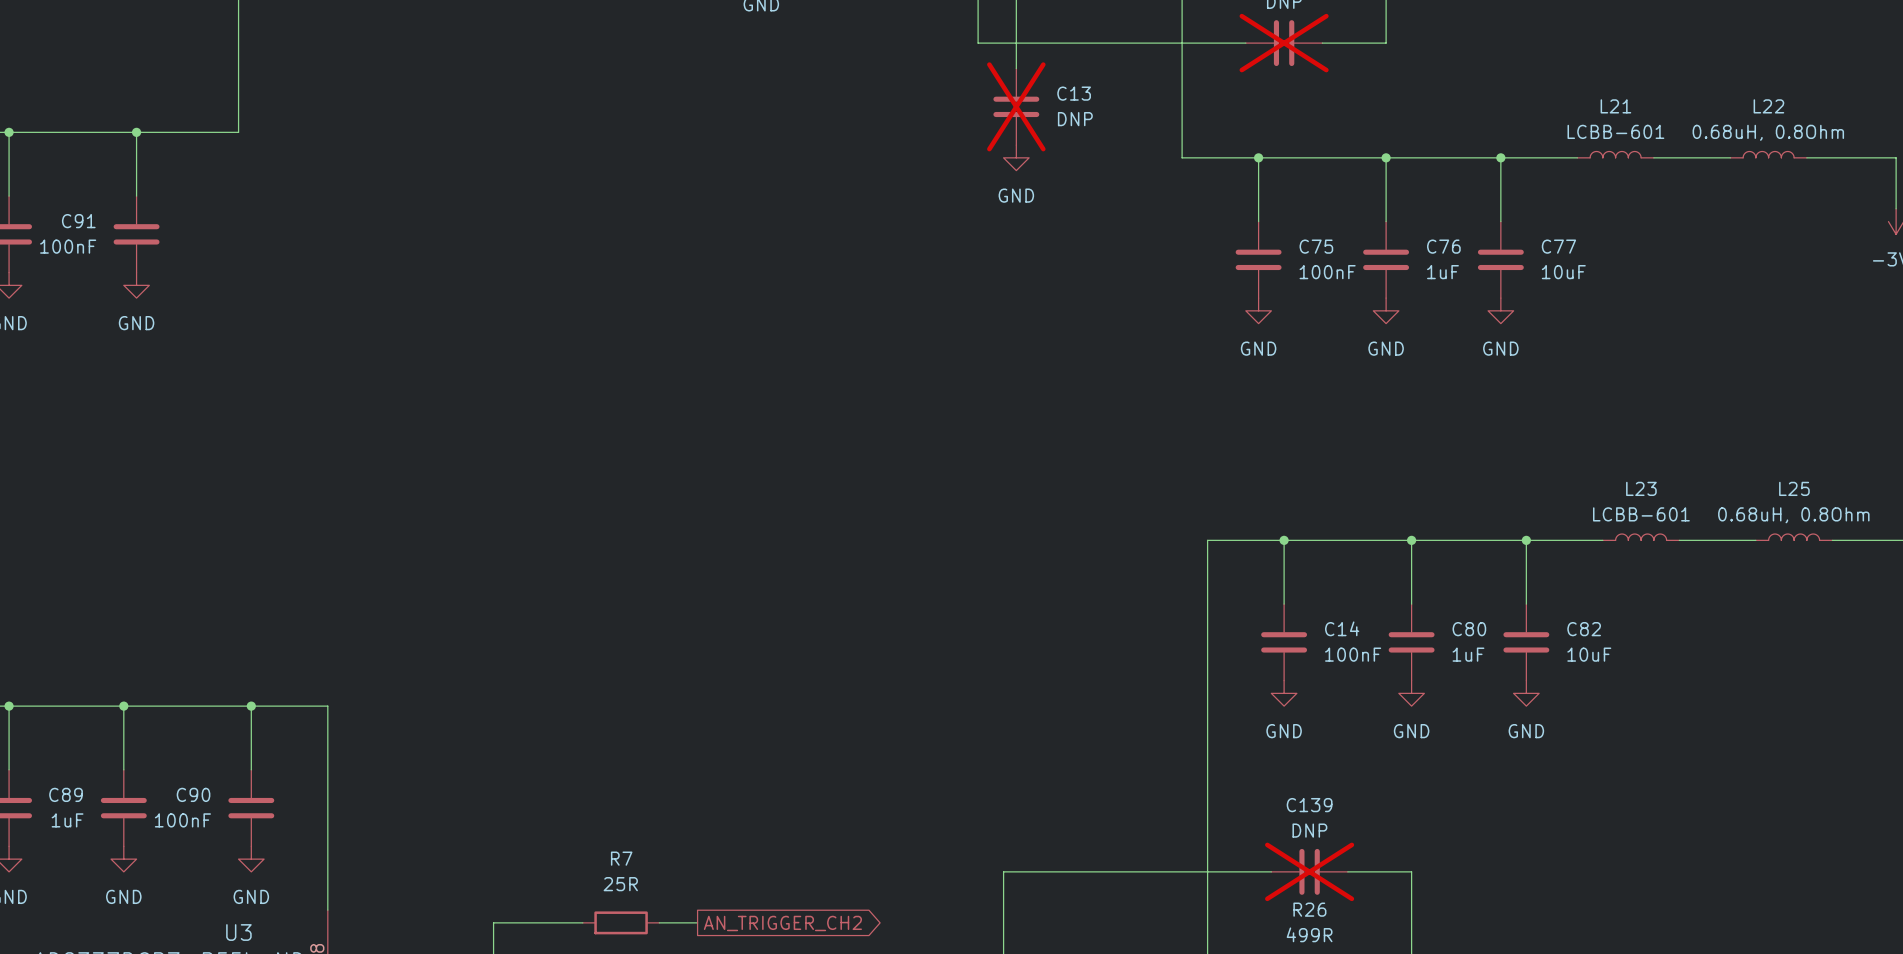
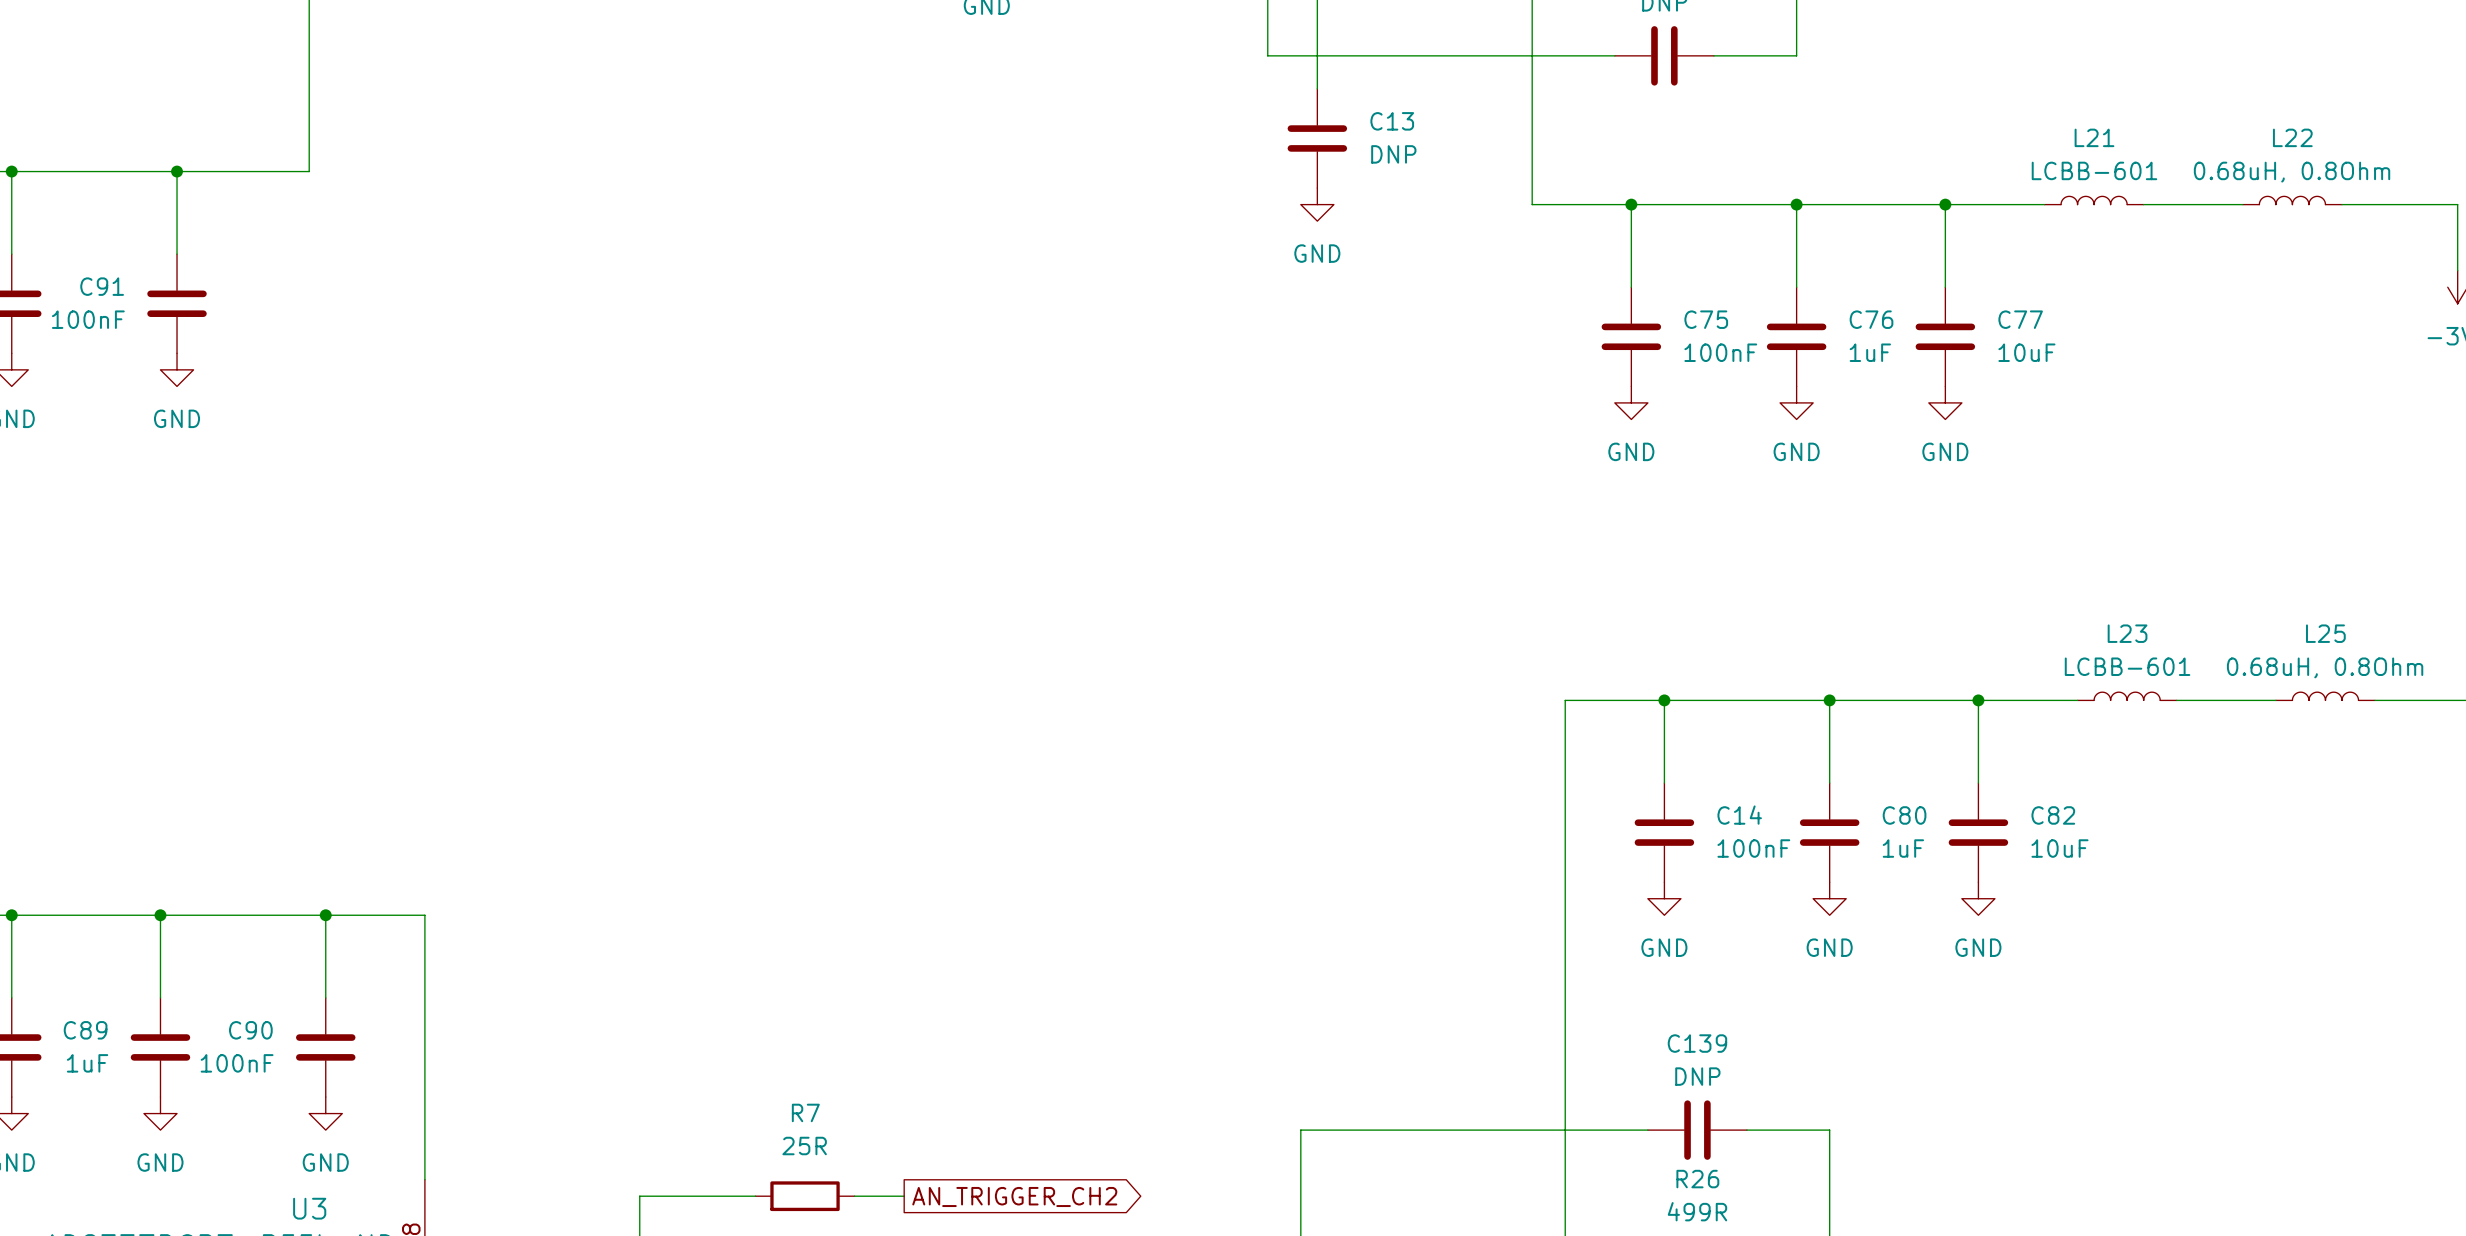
part do-not-place cross: (1284, 43) -> none
C13 do-not-place cross: (1016, 106) -> none
C139 do-not-place cross: (1309, 871) -> none

